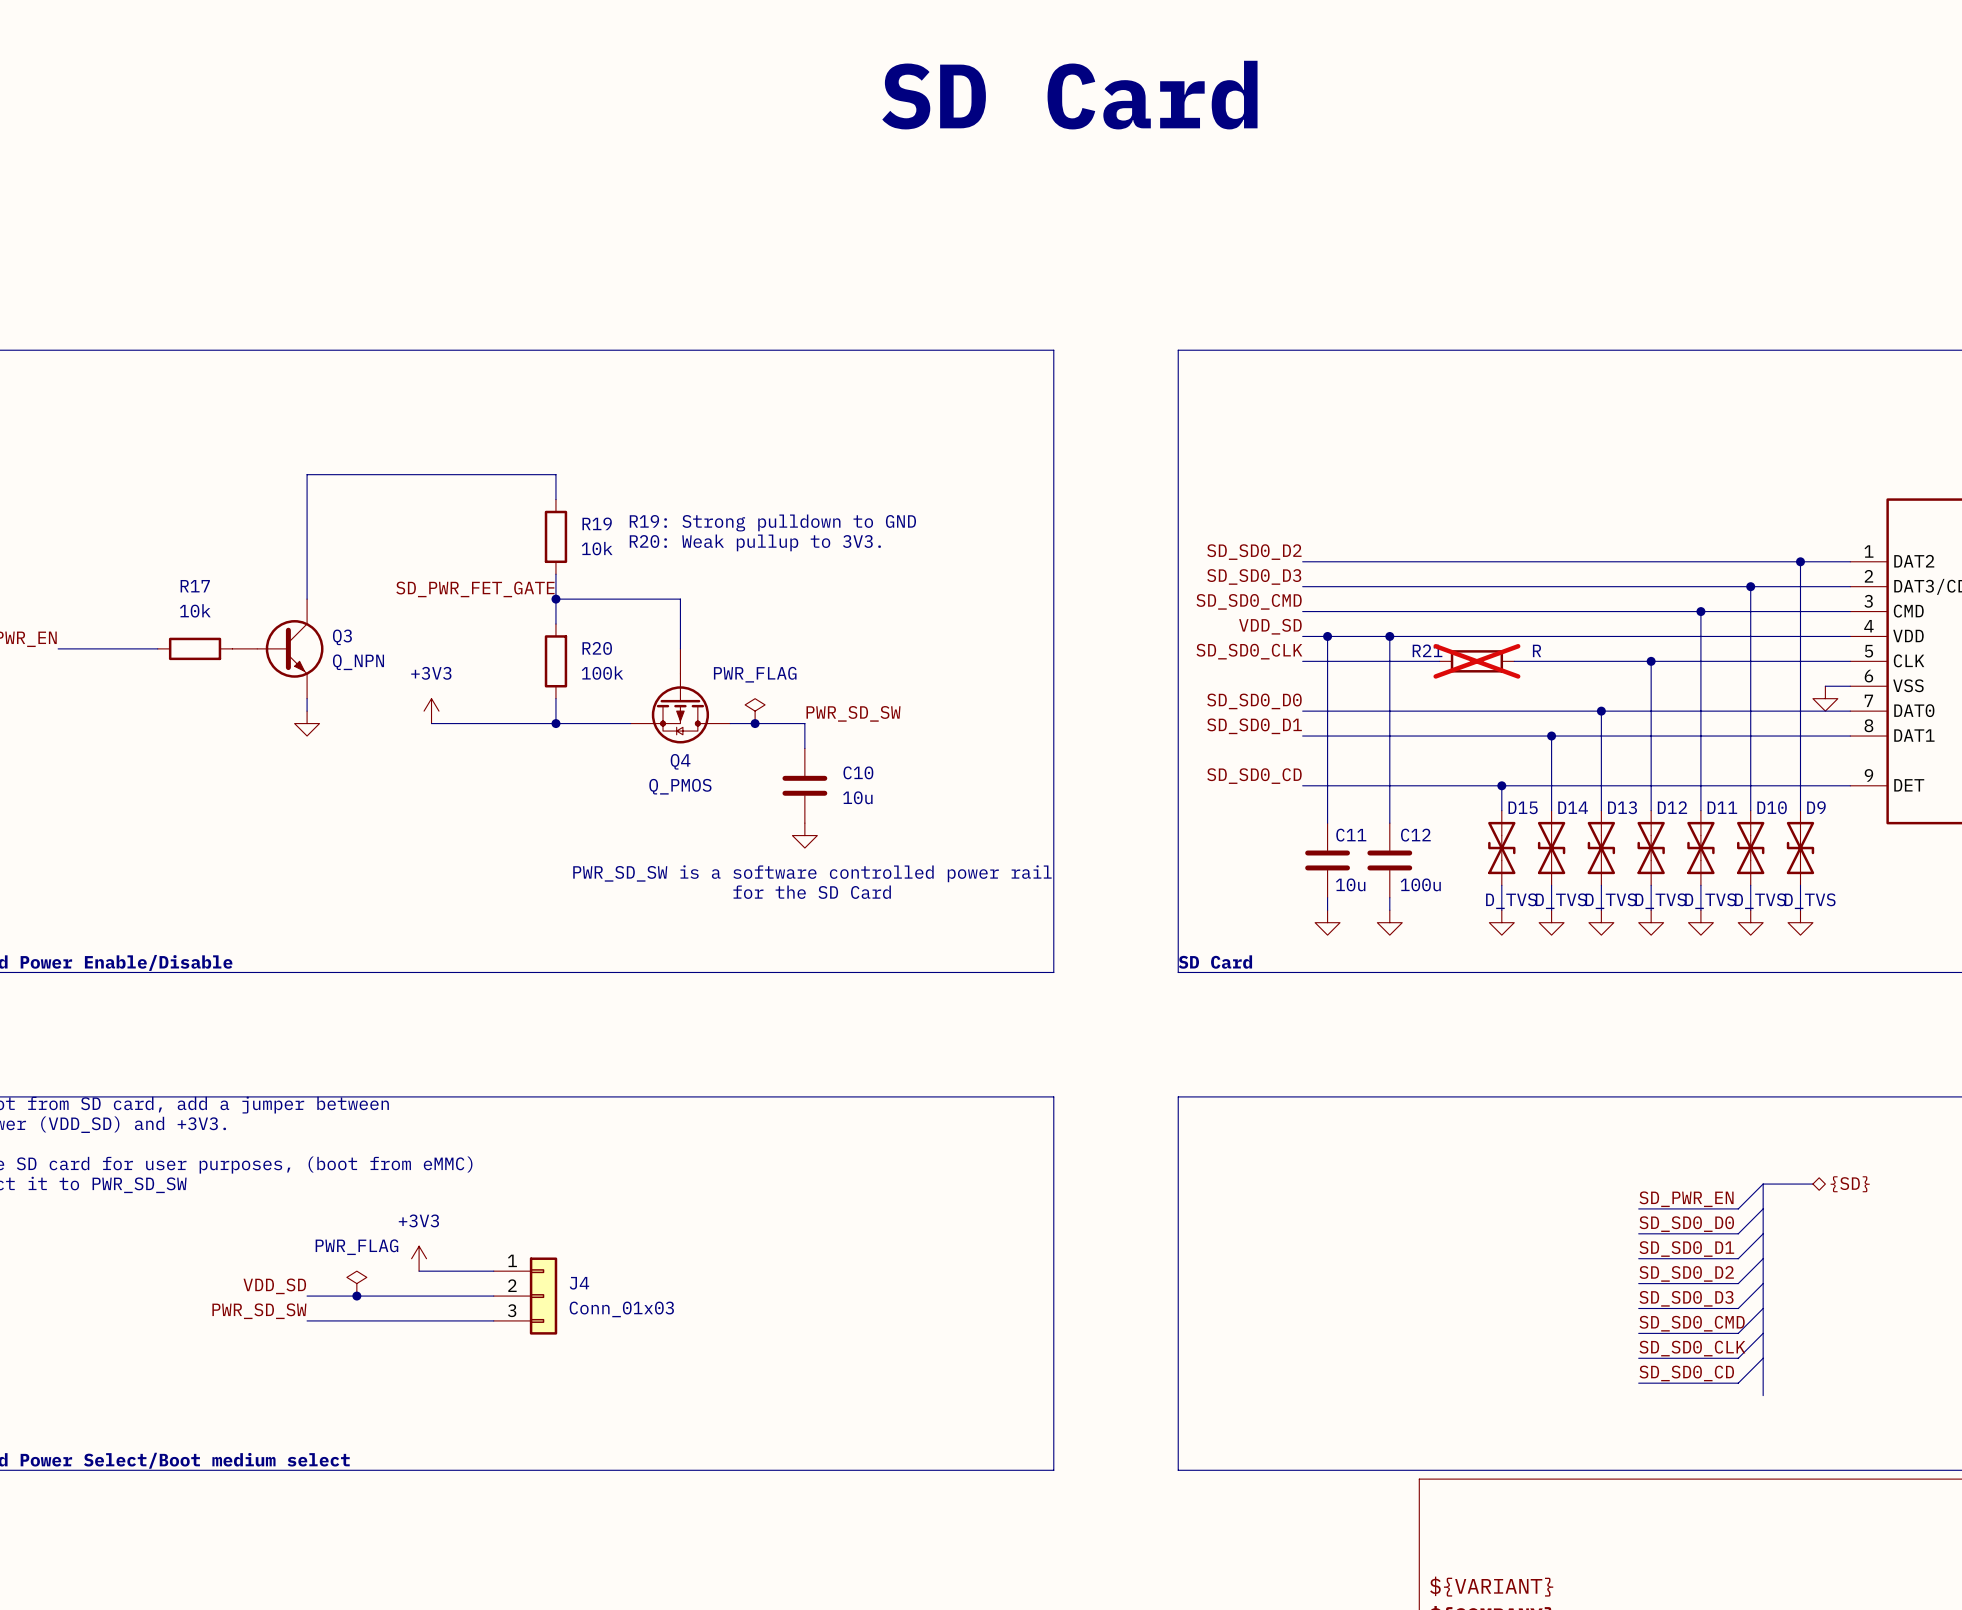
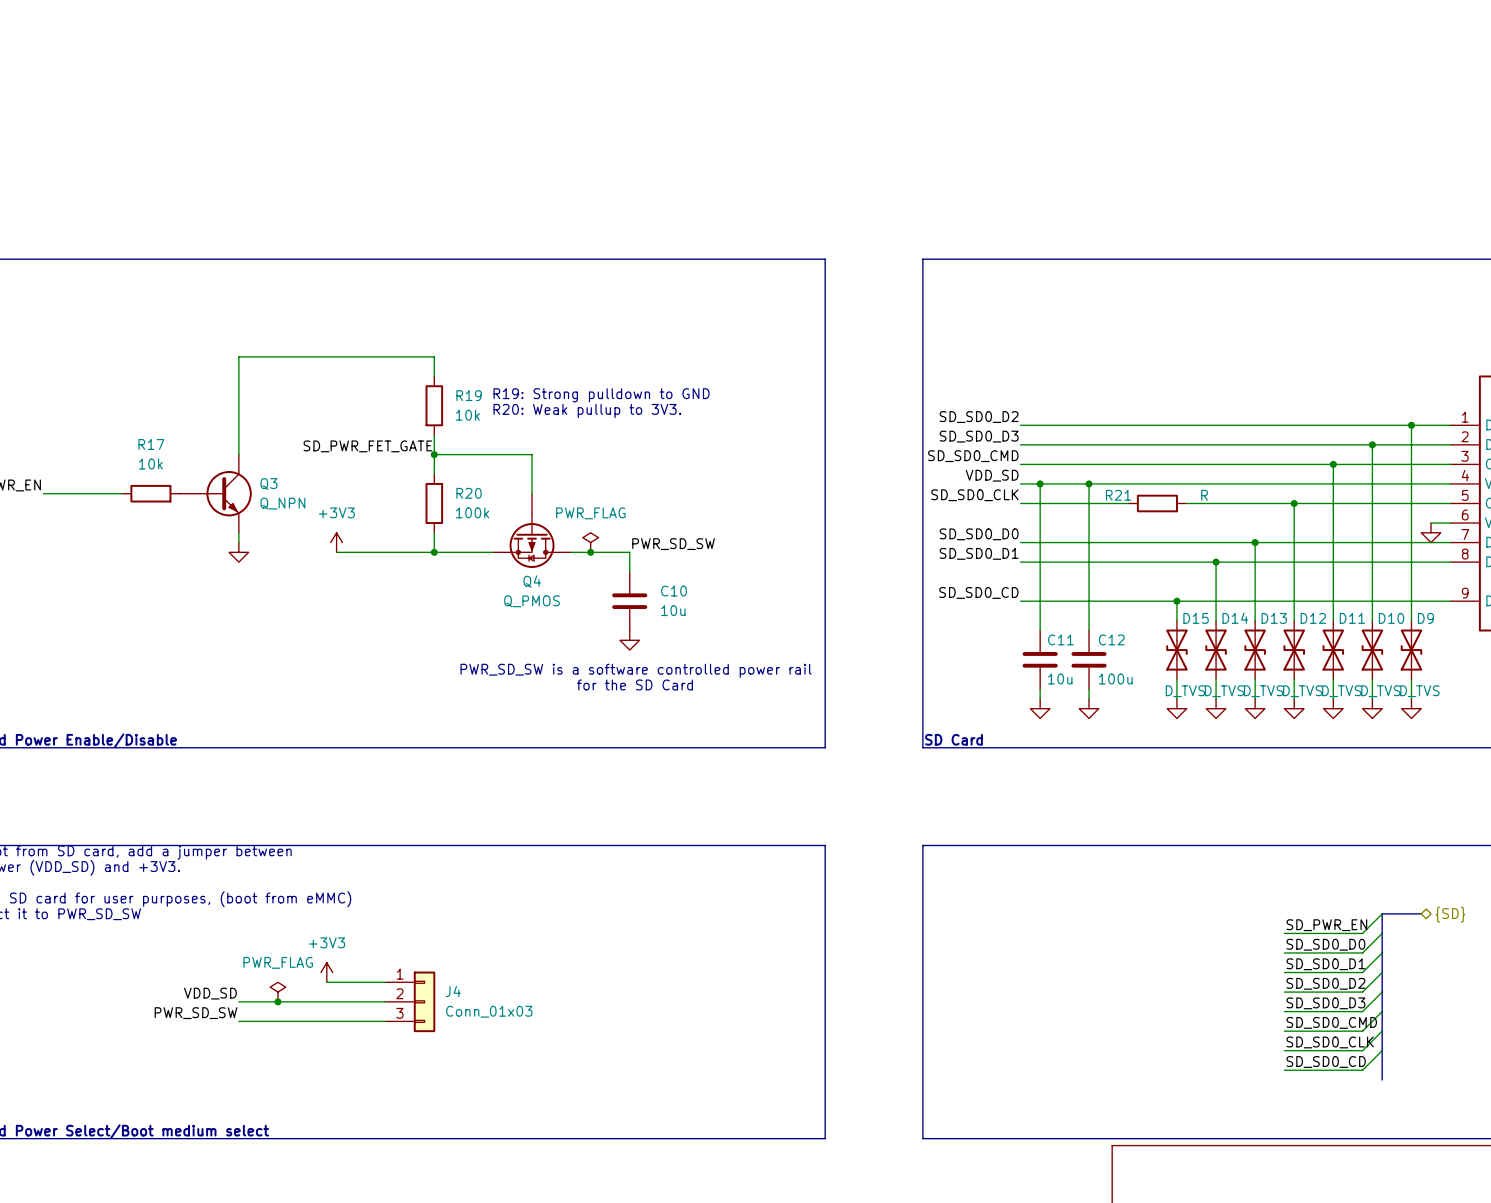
text: SD Card (1069, 95) -> none
R21 do-not-place cross: (1476, 661) -> none

